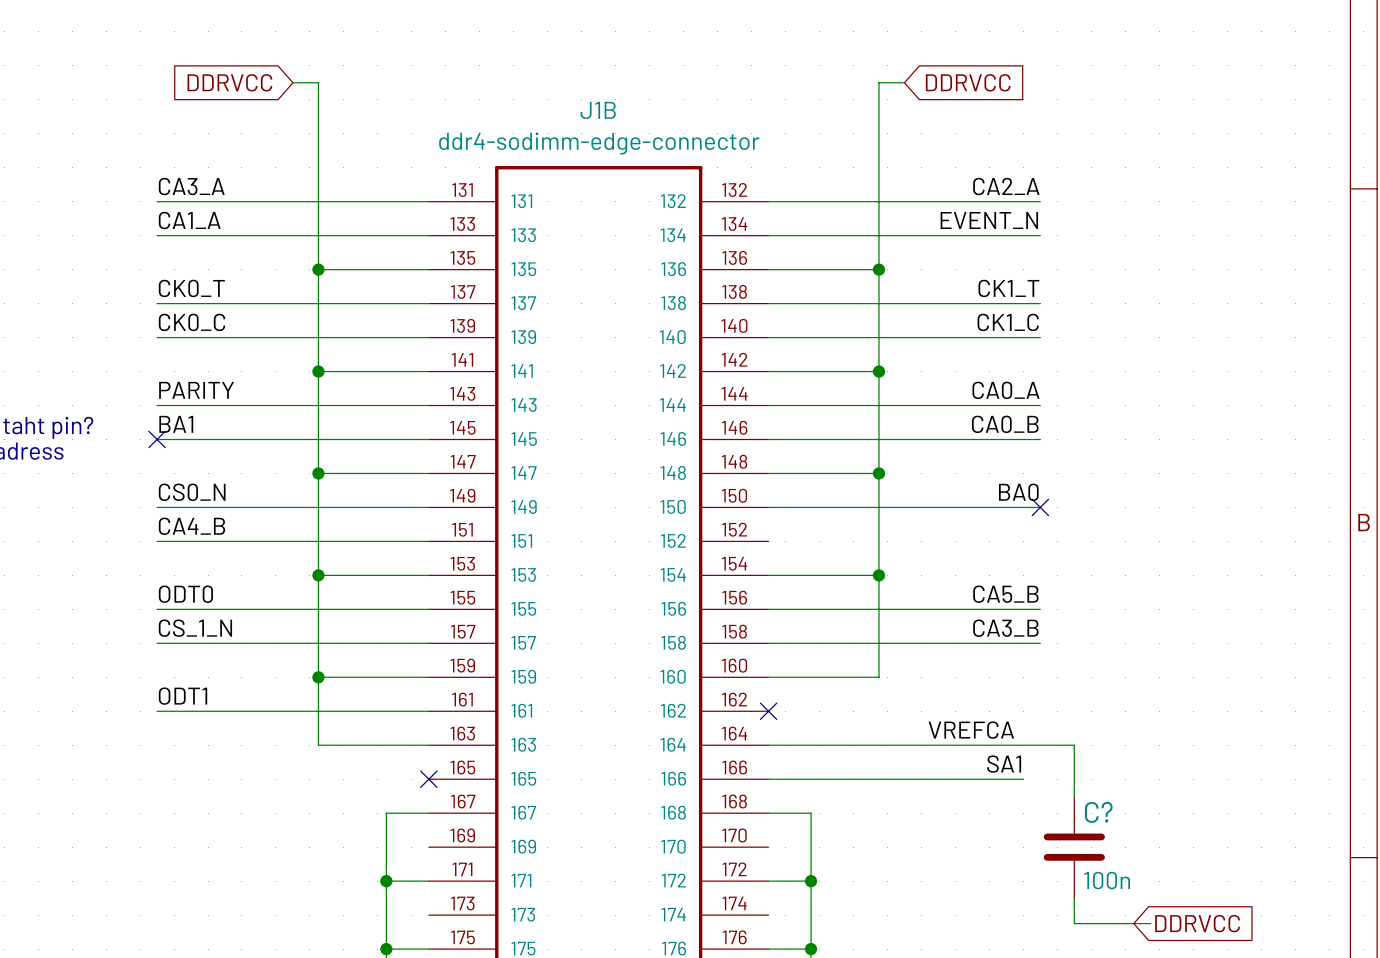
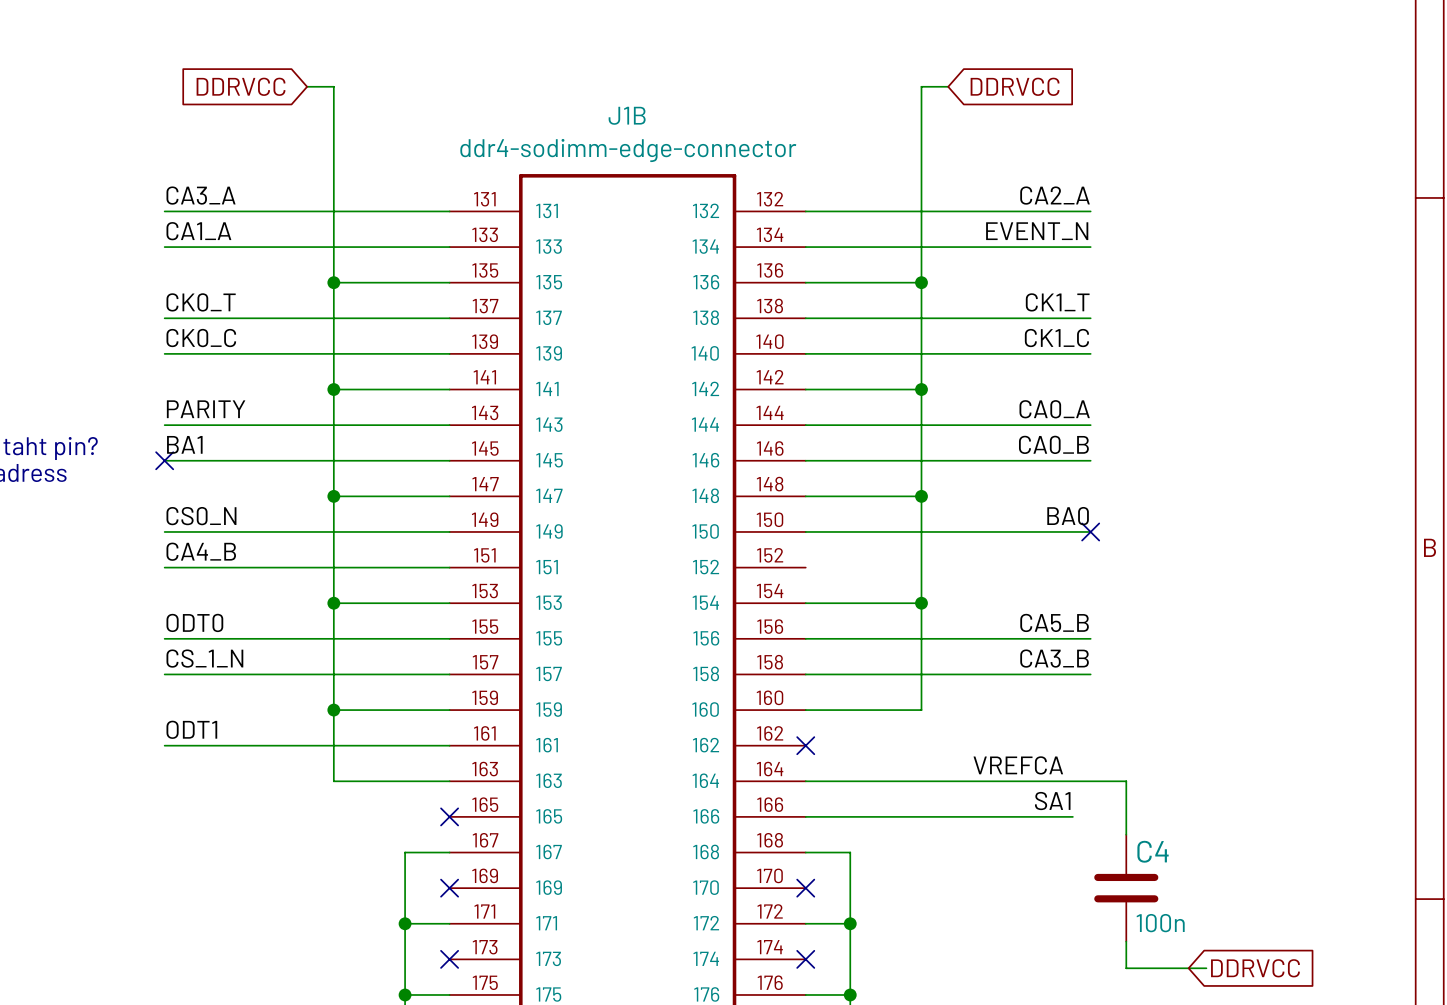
C? name: C? (1098, 812) -> C4 (1153, 851)
no-connect mark: none -> (449, 888)
no-connect mark: none -> (805, 888)
no-connect mark: none -> (449, 959)
no-connect mark: none -> (805, 959)

